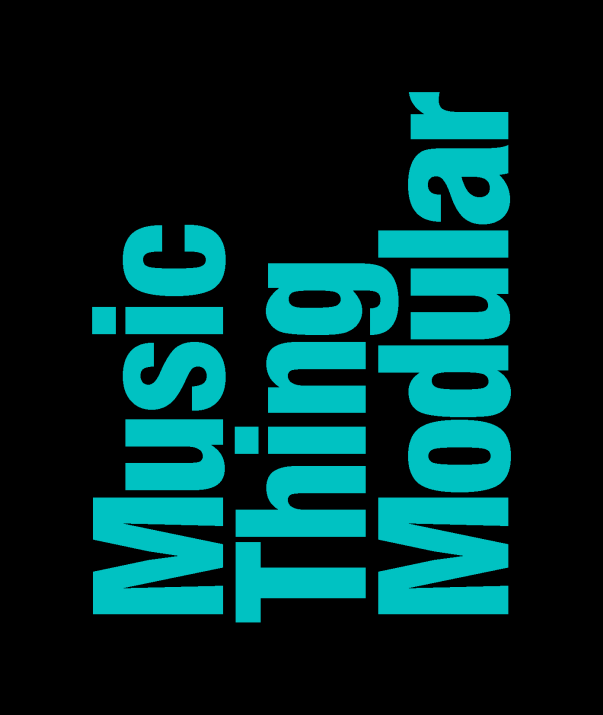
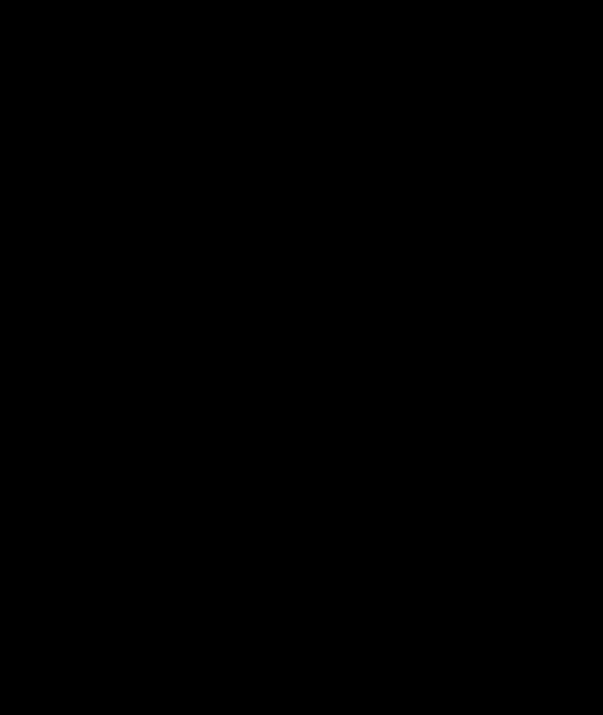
drawing: [92, 92, 511, 623] -> none

